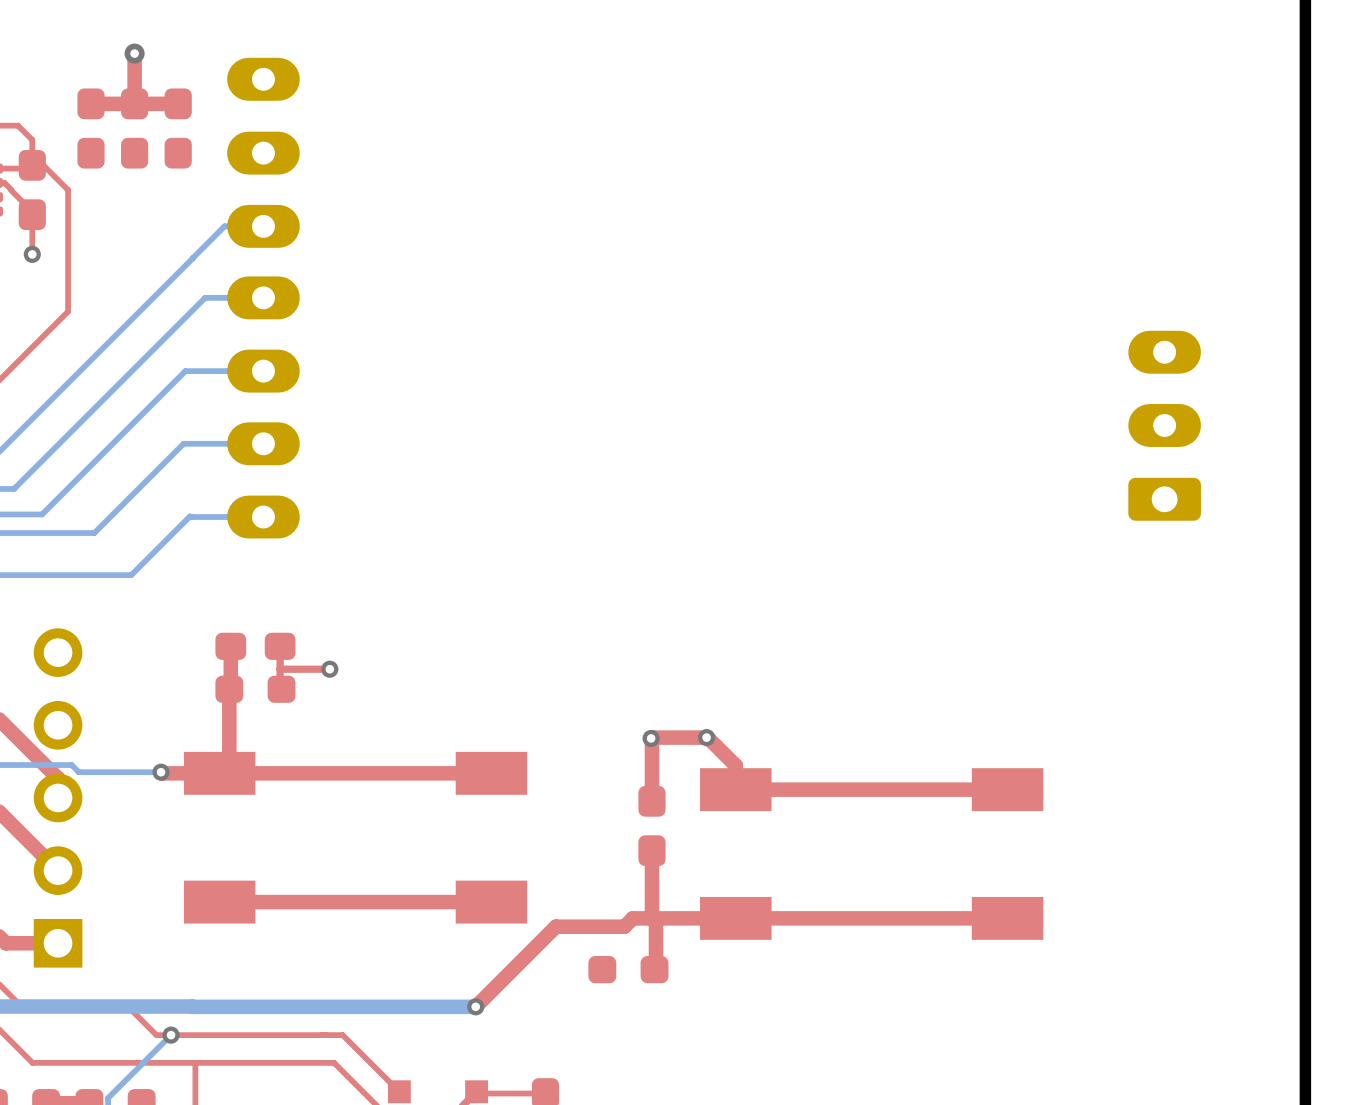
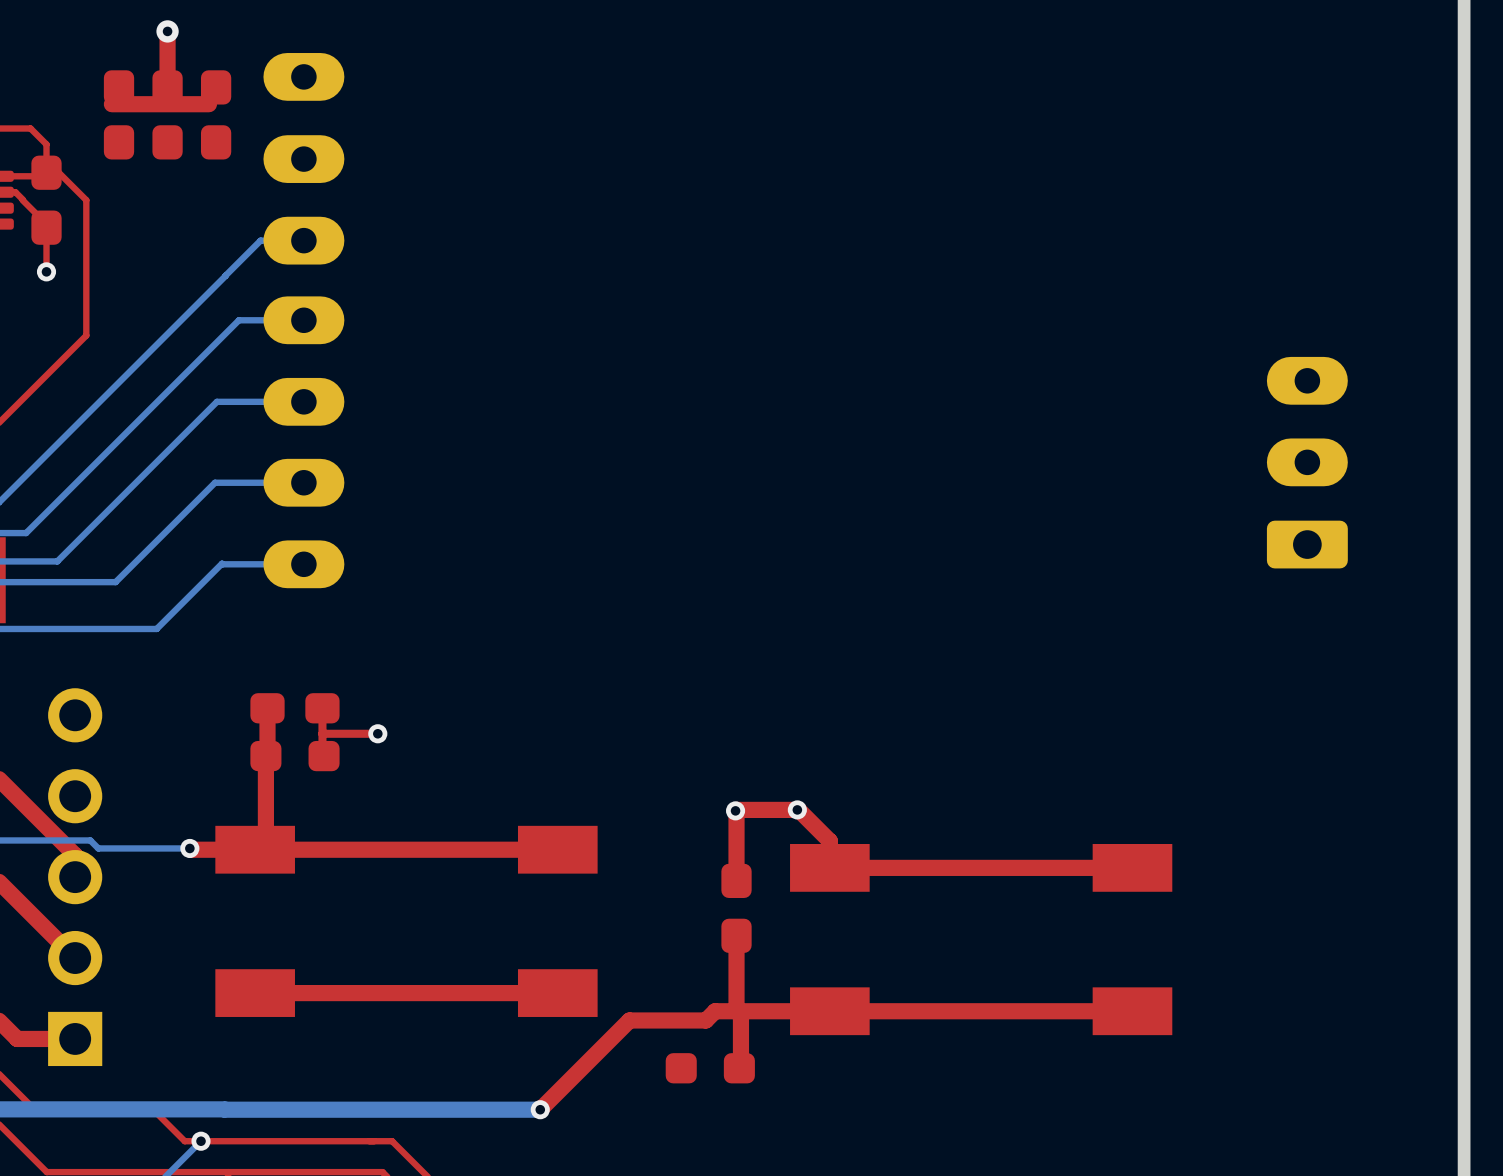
top track: (134, 53) (134, 103) -> (167, 31) (167, 87)
via position: (134, 53) -> (167, 31)
part position: (91, 128) -> (119, 114)
part position: (134, 128) -> (167, 114)
part position: (178, 128) -> (216, 114)

